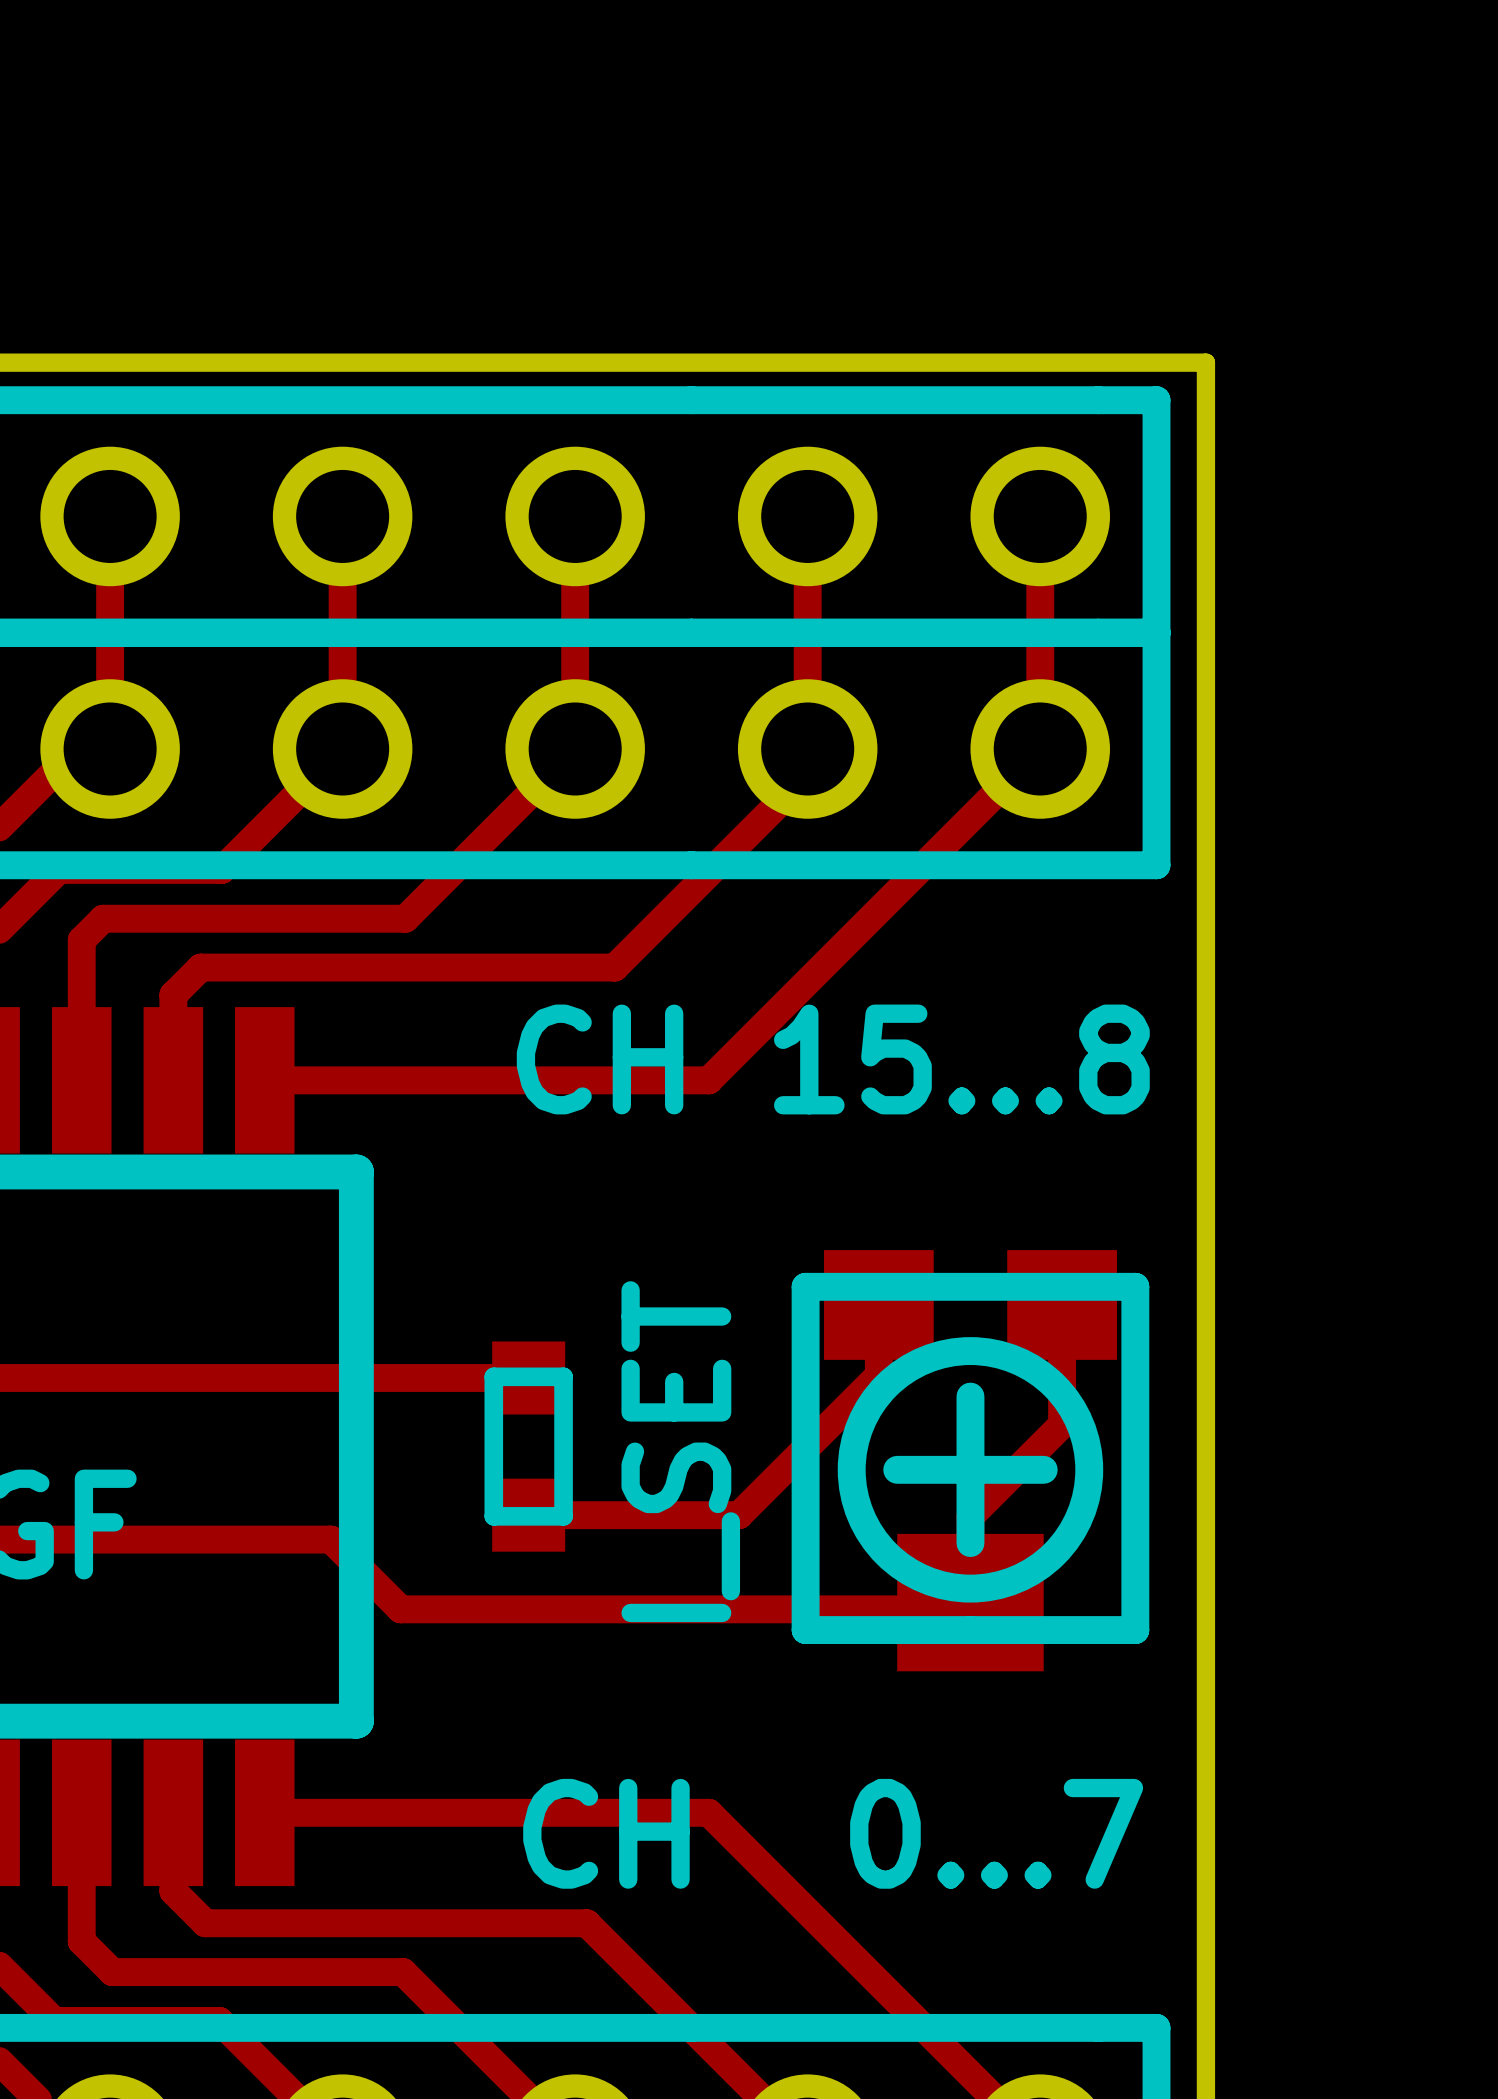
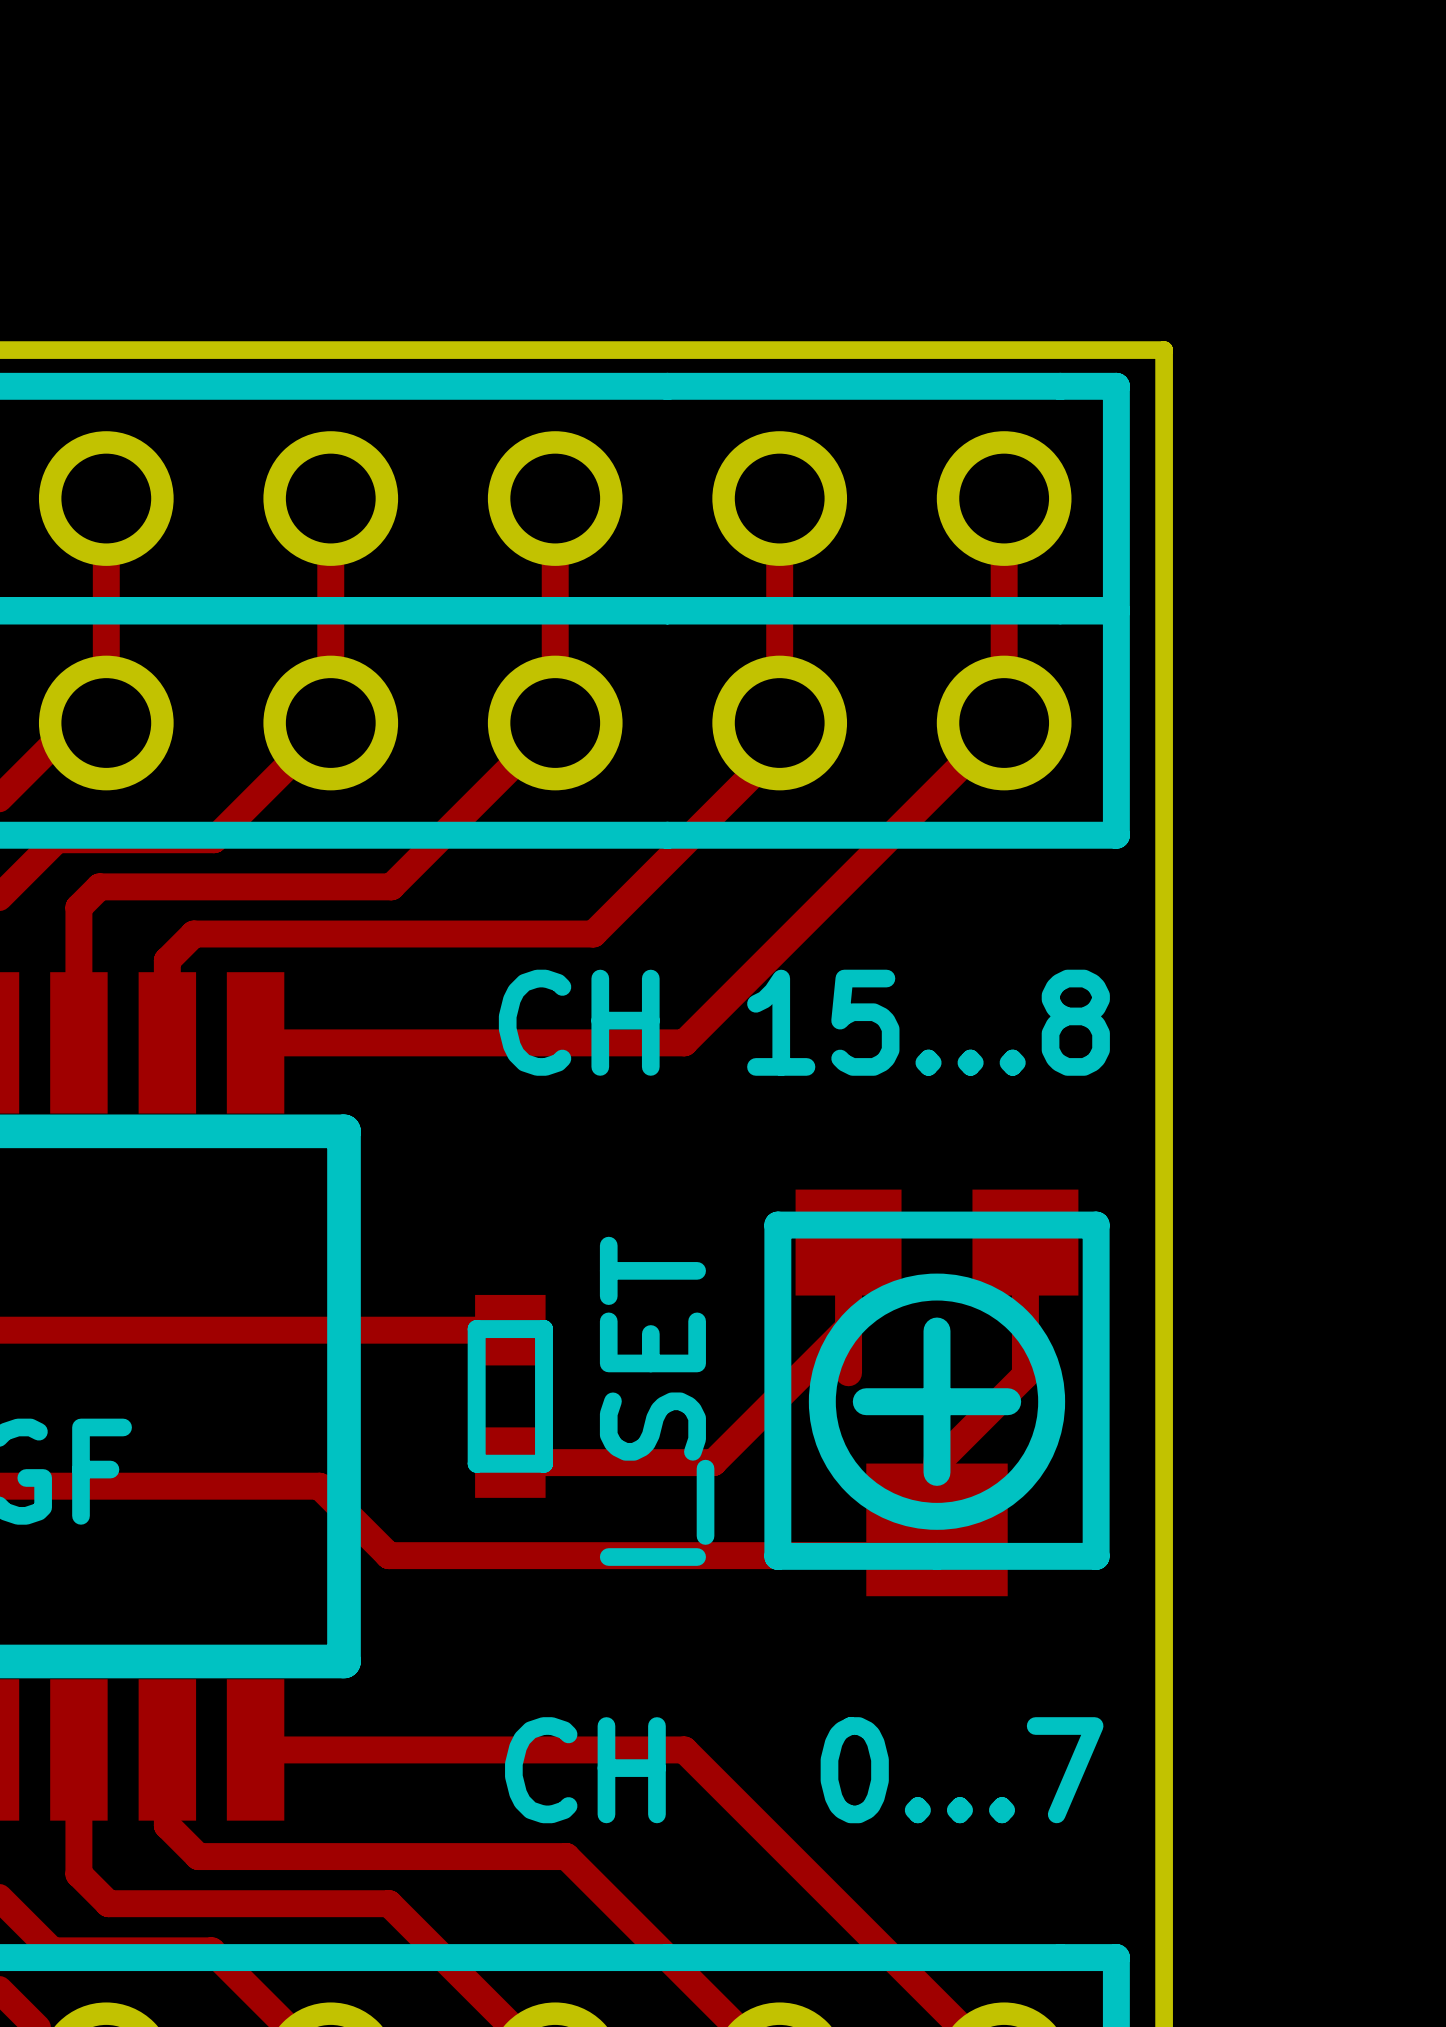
part position: (970, 1460) -> (936, 1392)
top track: (953, 1586) (970, 1602) (963, 1609) (400, 1609) -> (921, 1513) (936, 1529) (911, 1555) (388, 1555) (386, 1553)

